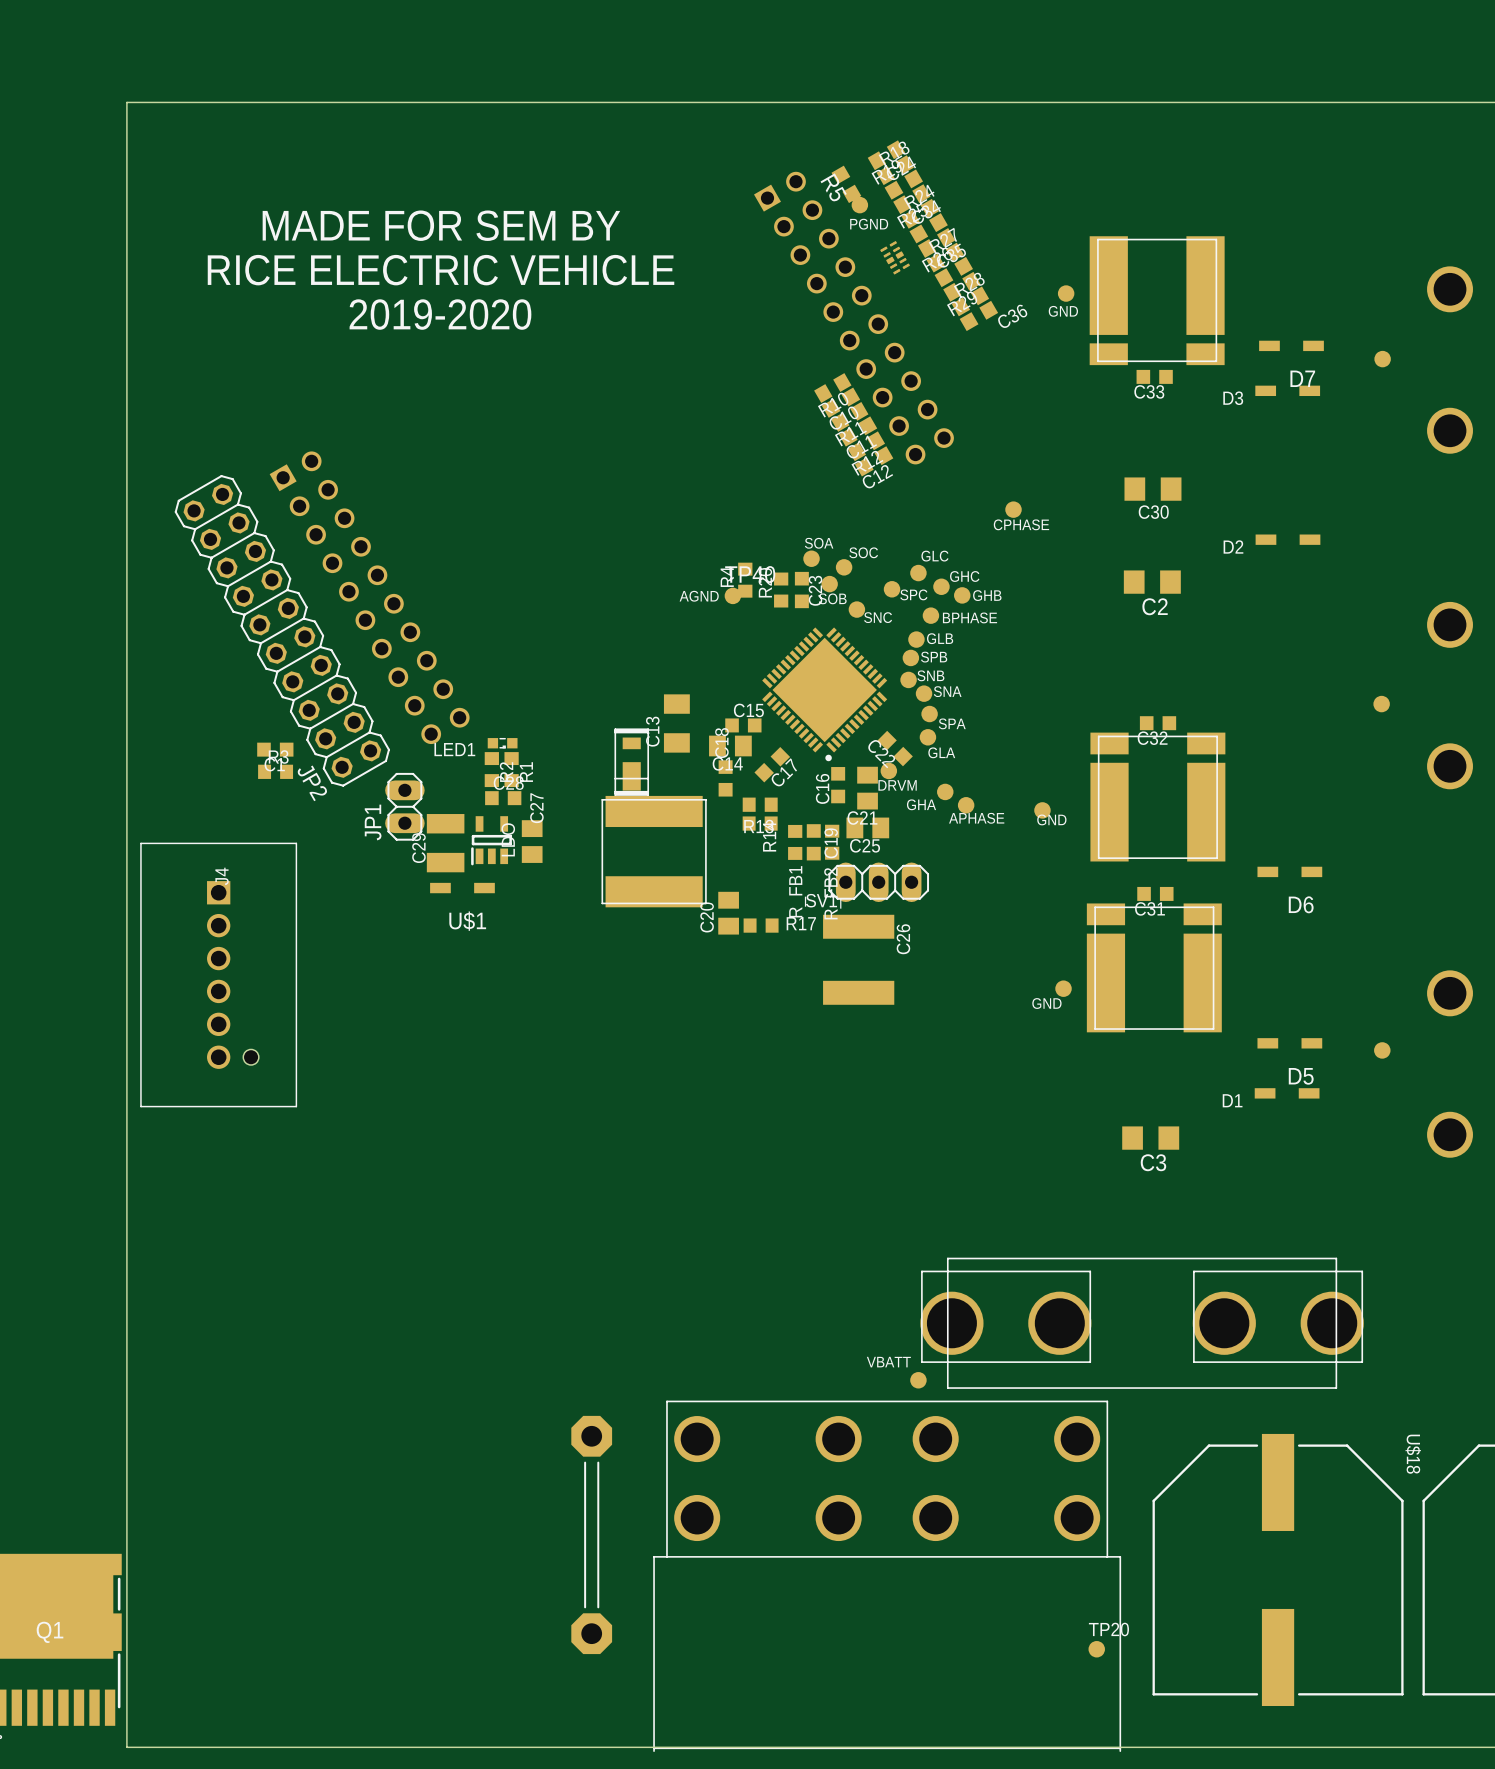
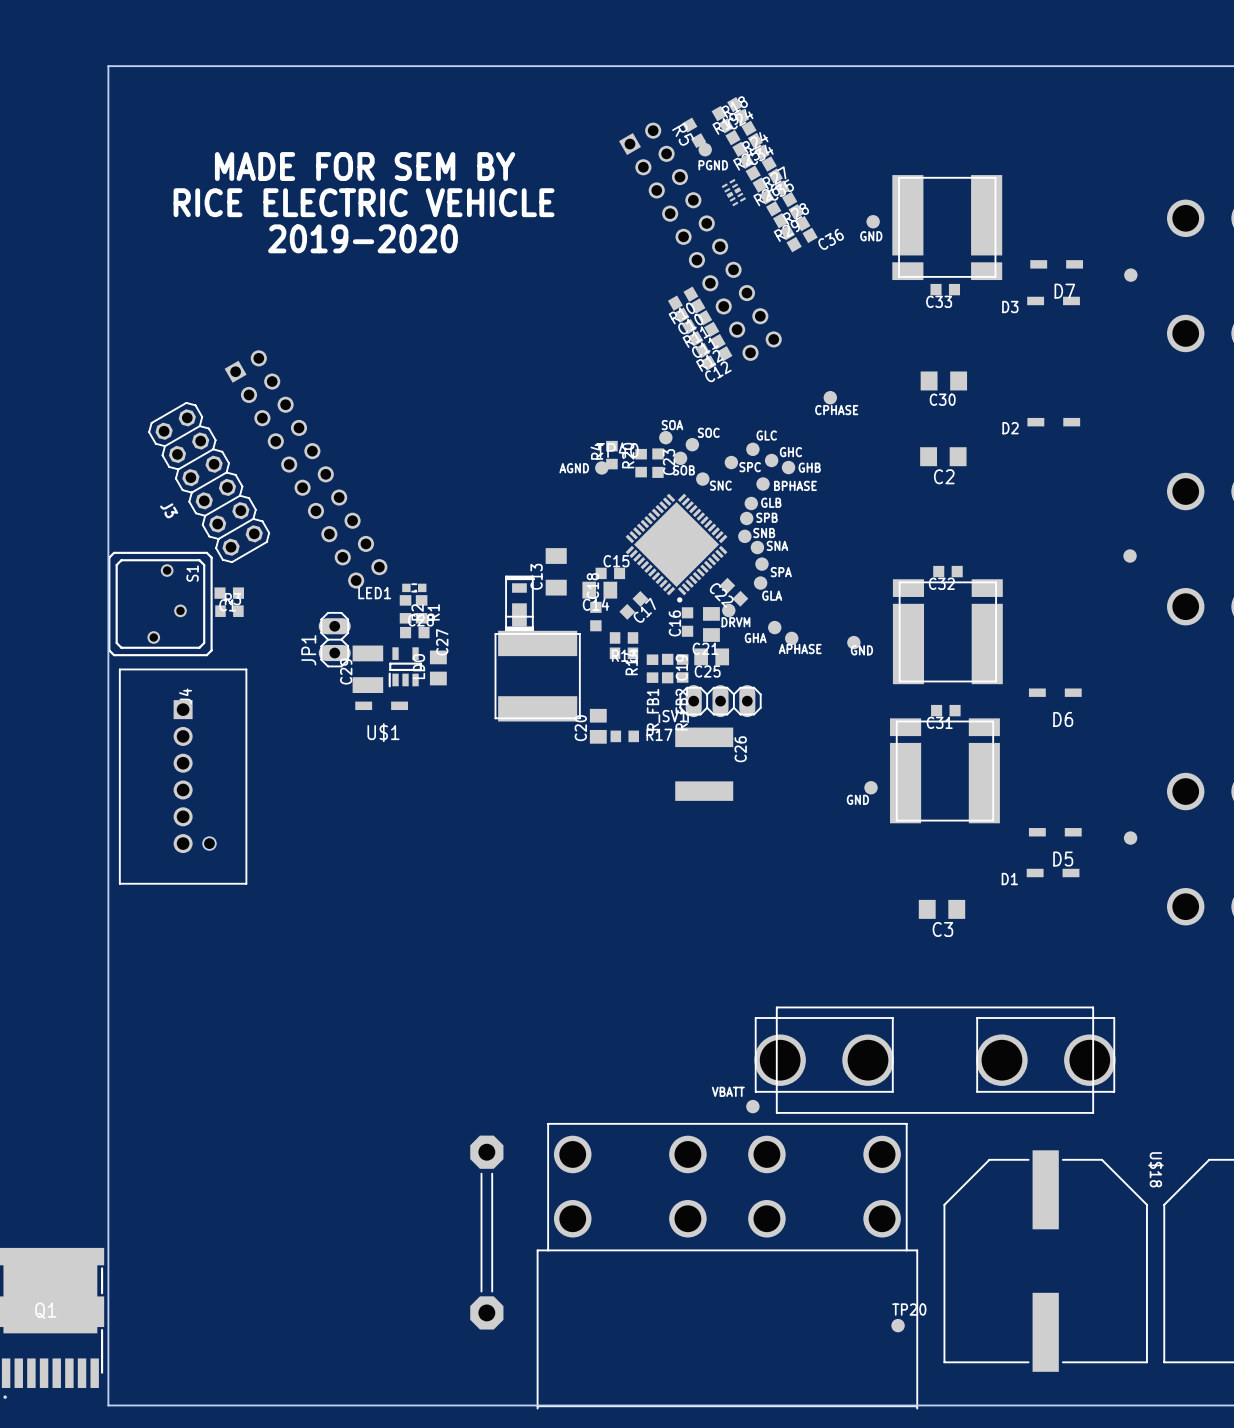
J3: none -> (209, 482)
JP2: (282, 630) -> none
S1: none -> (160, 604)

